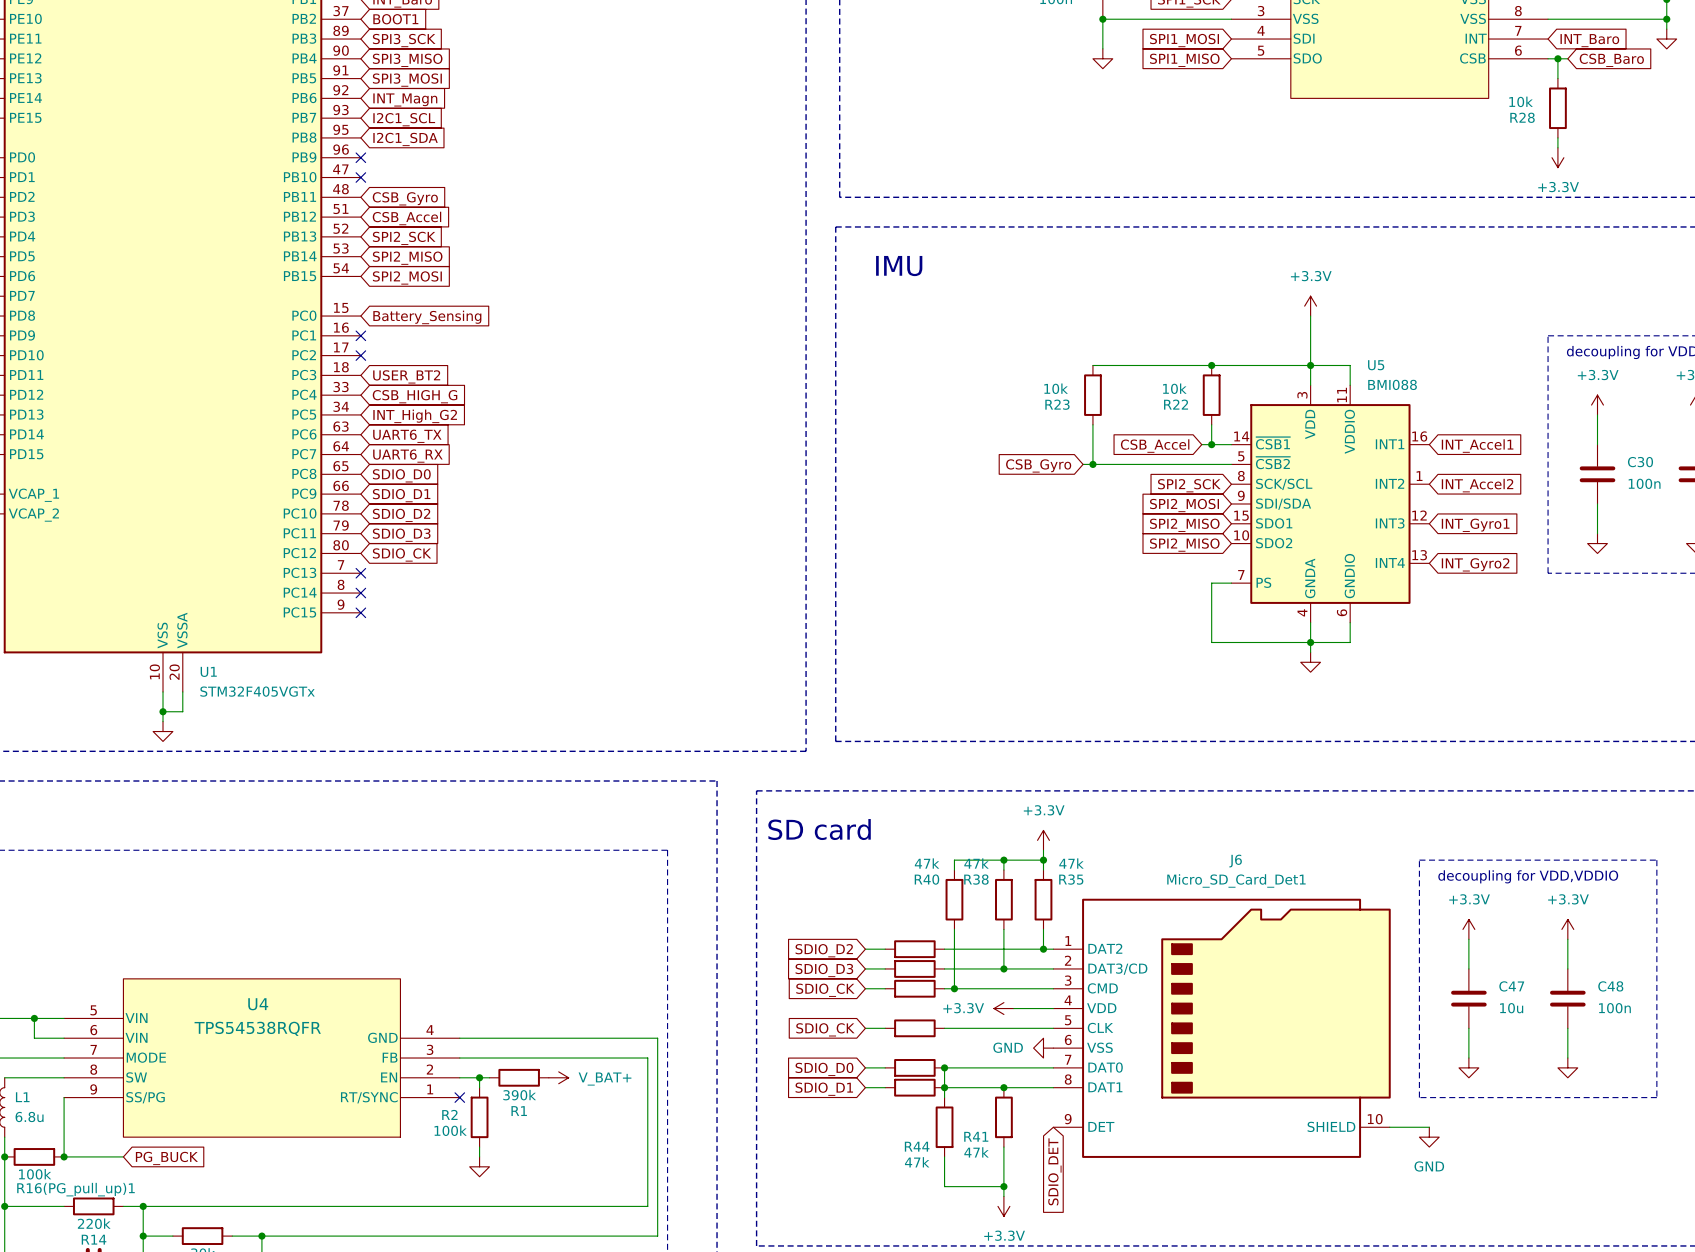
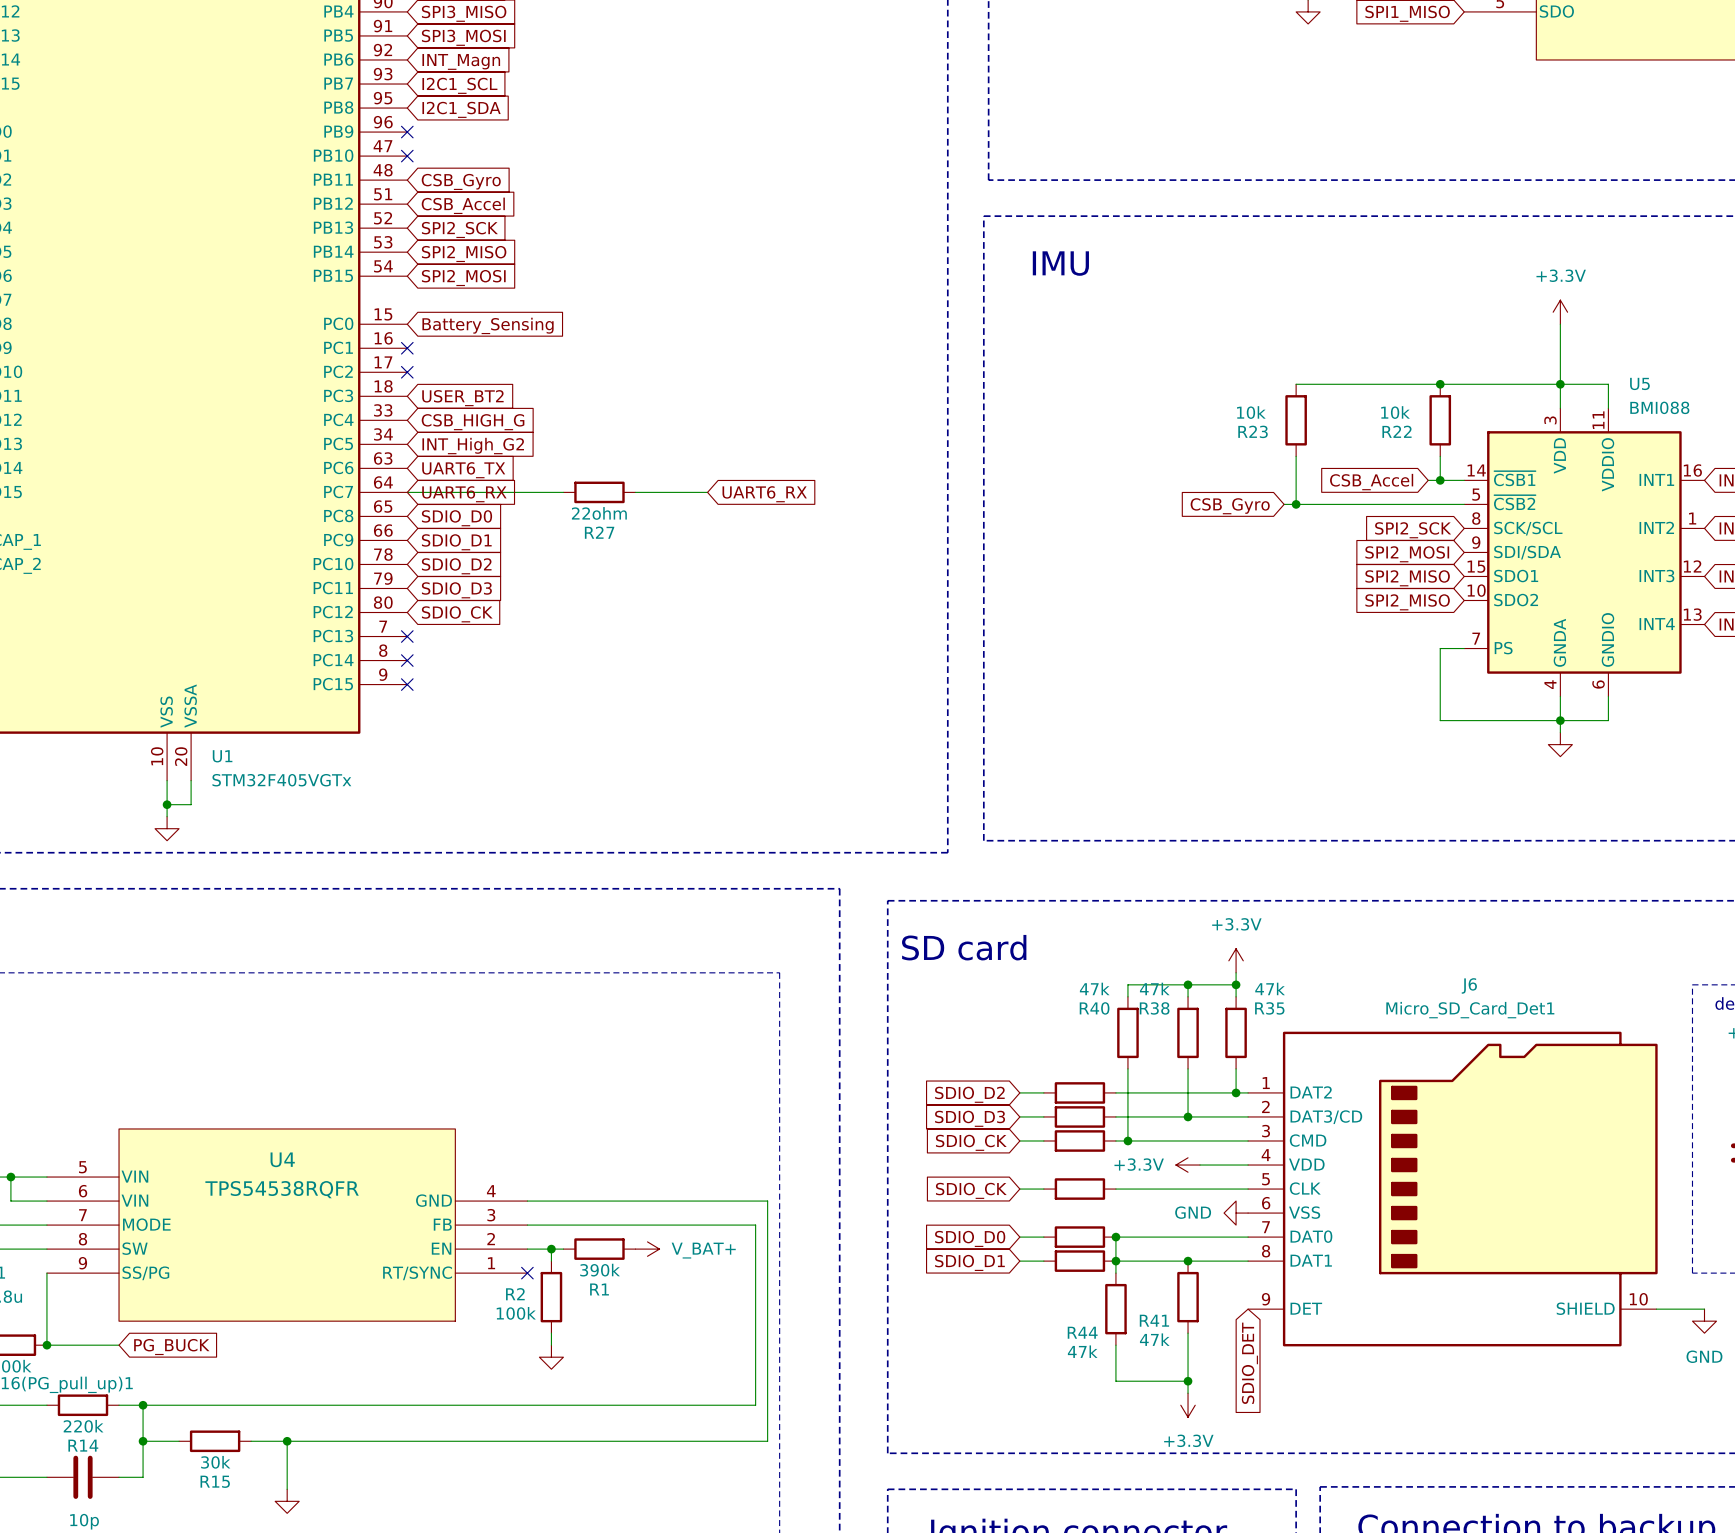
wire: none -> (407, 492) (563, 492)
R27: none -> 22ohm (599, 492)
wire: none -> (635, 492) (707, 492)
global label: none -> UART6_RX (764, 494)

